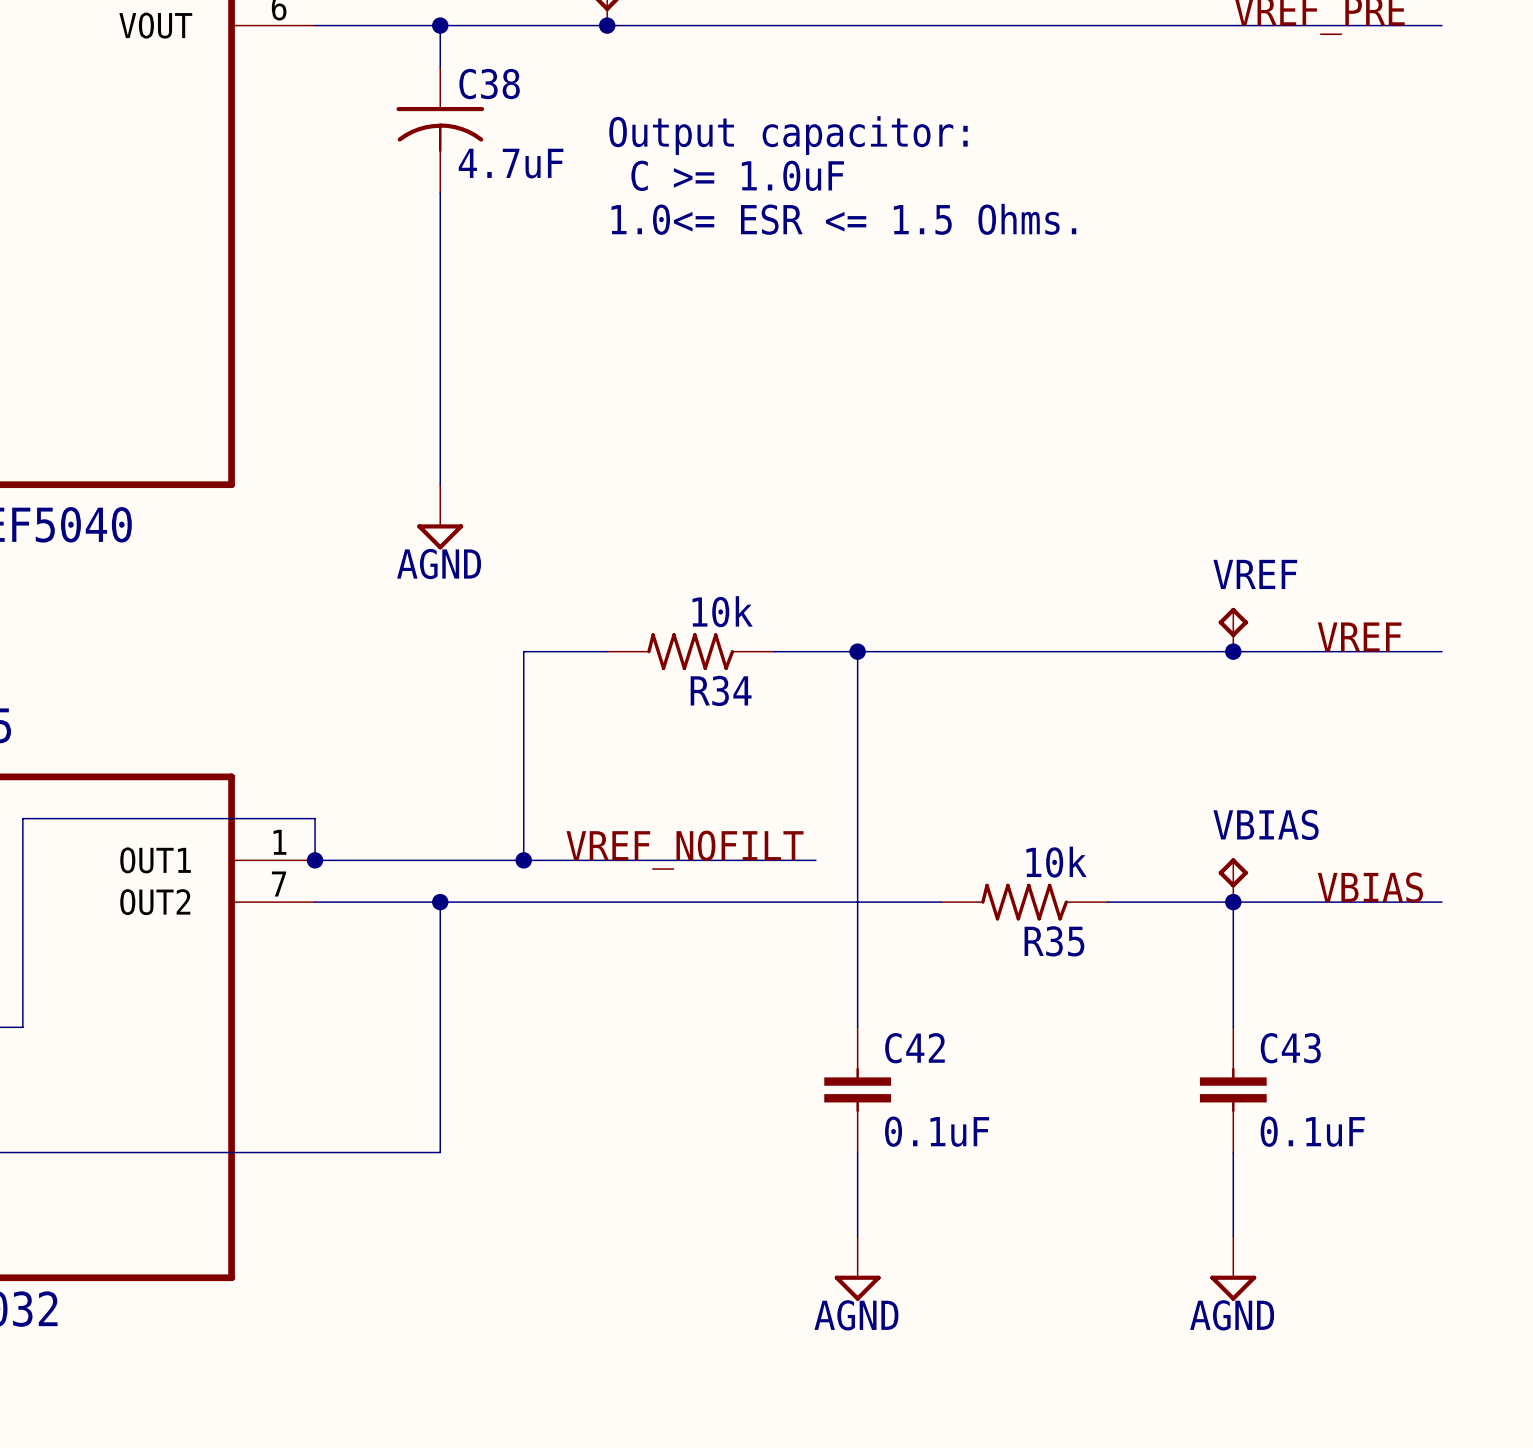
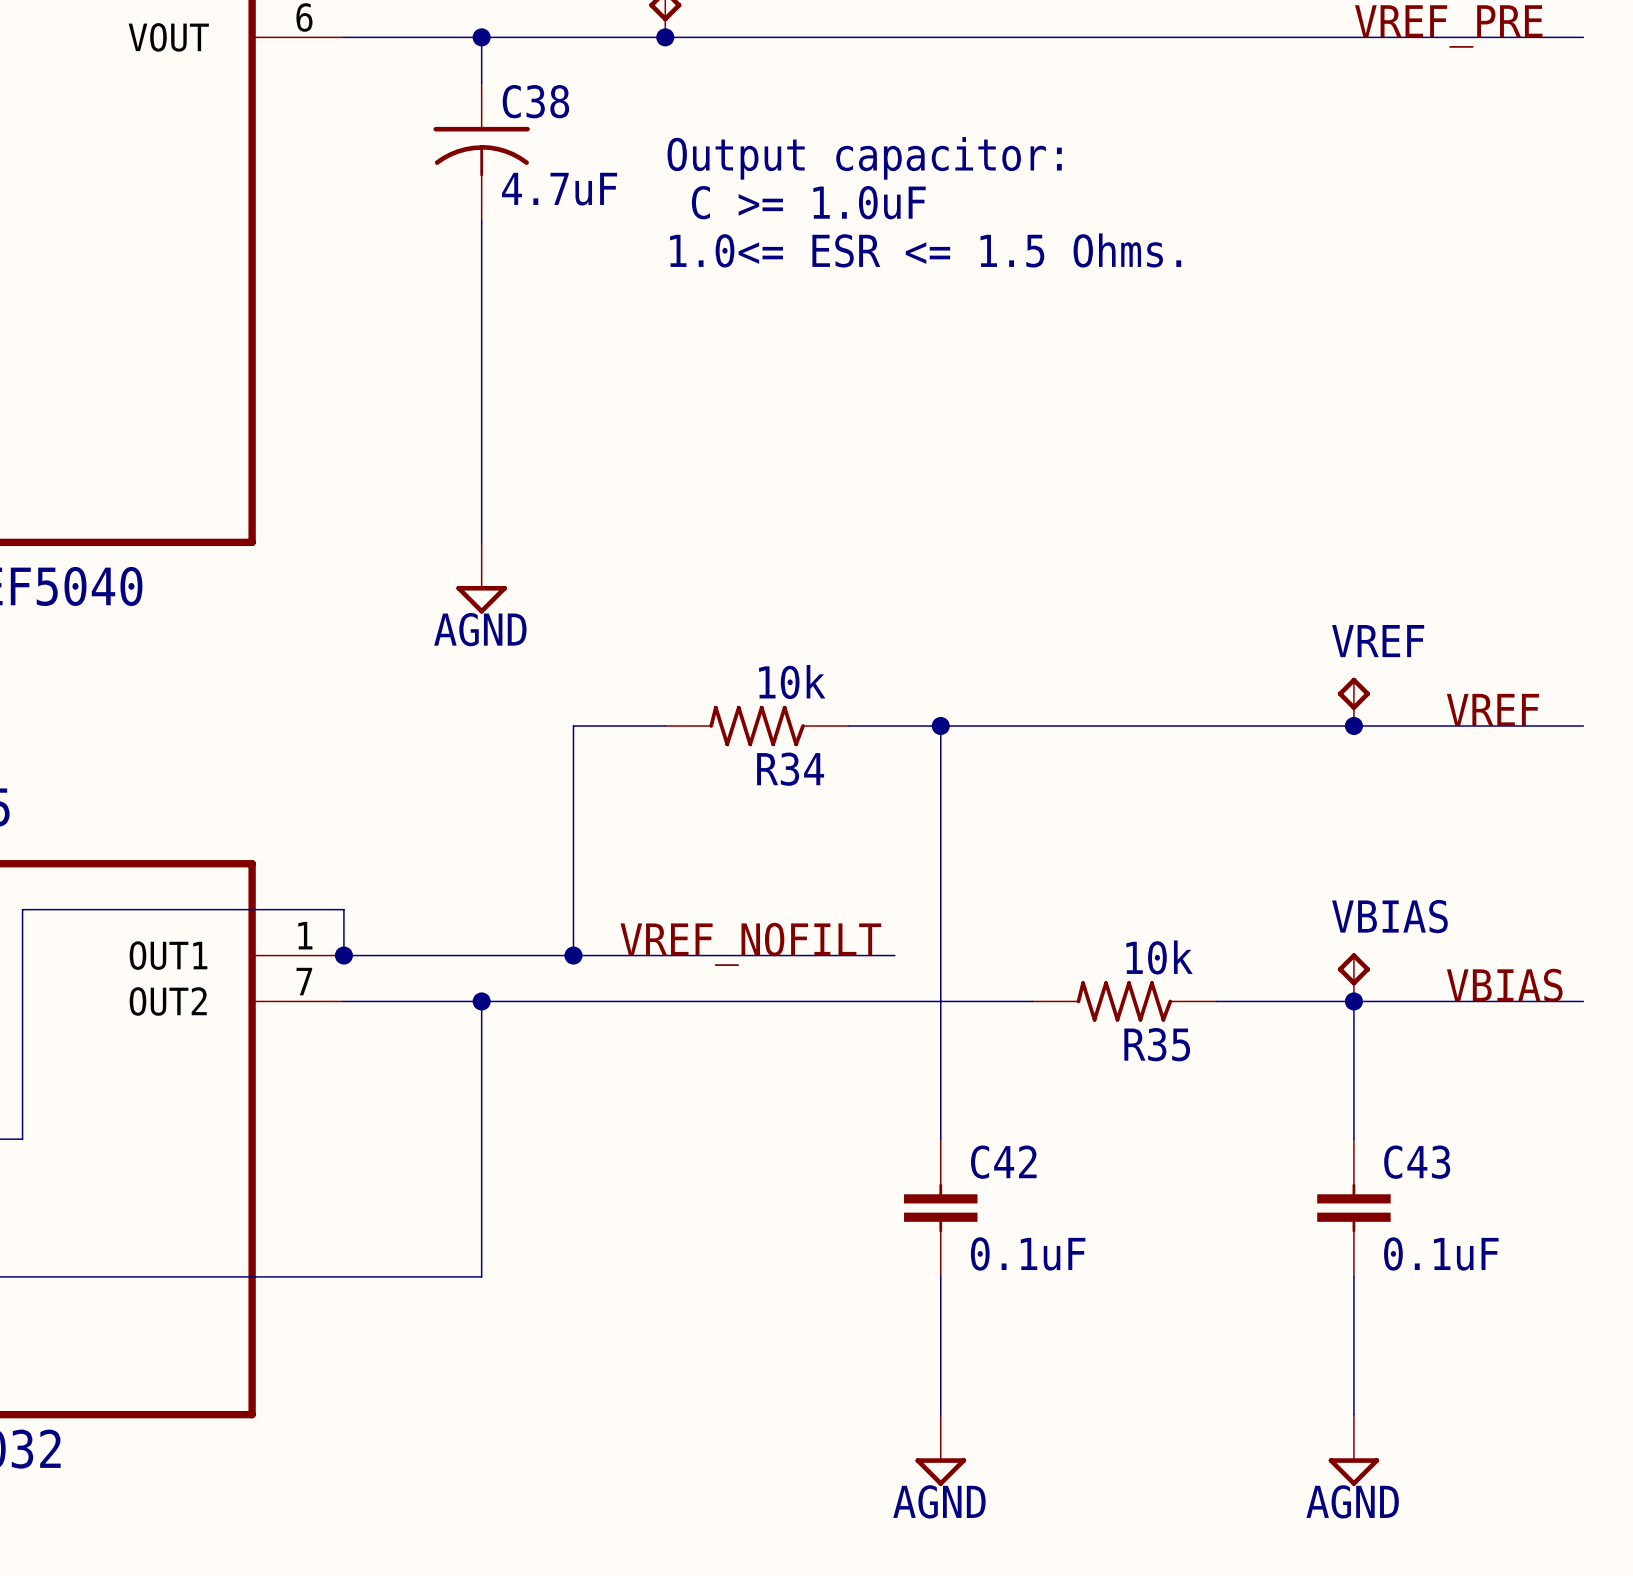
power symbol position: AGND (857, 1268) -> AGND (940, 1450)
power symbol position: AGND (1233, 1268) -> AGND (1353, 1450)

